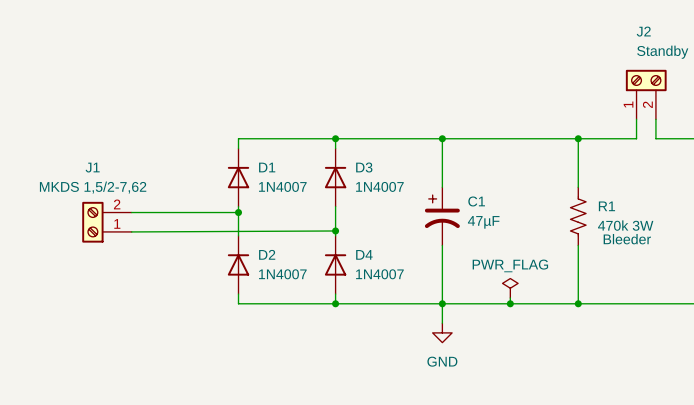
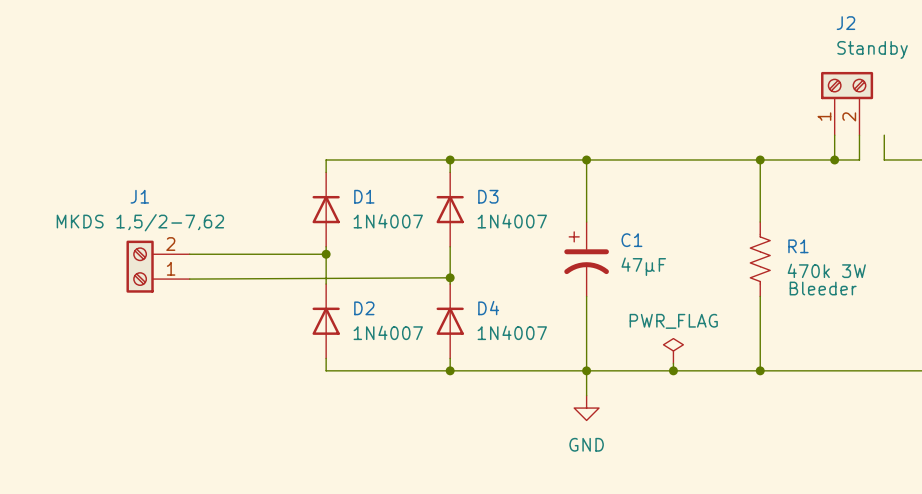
wire: none -> (834, 159) (859, 159)
junction: none -> (834, 159)
wire: (655, 138) (675, 138) -> (884, 135) (884, 159)

